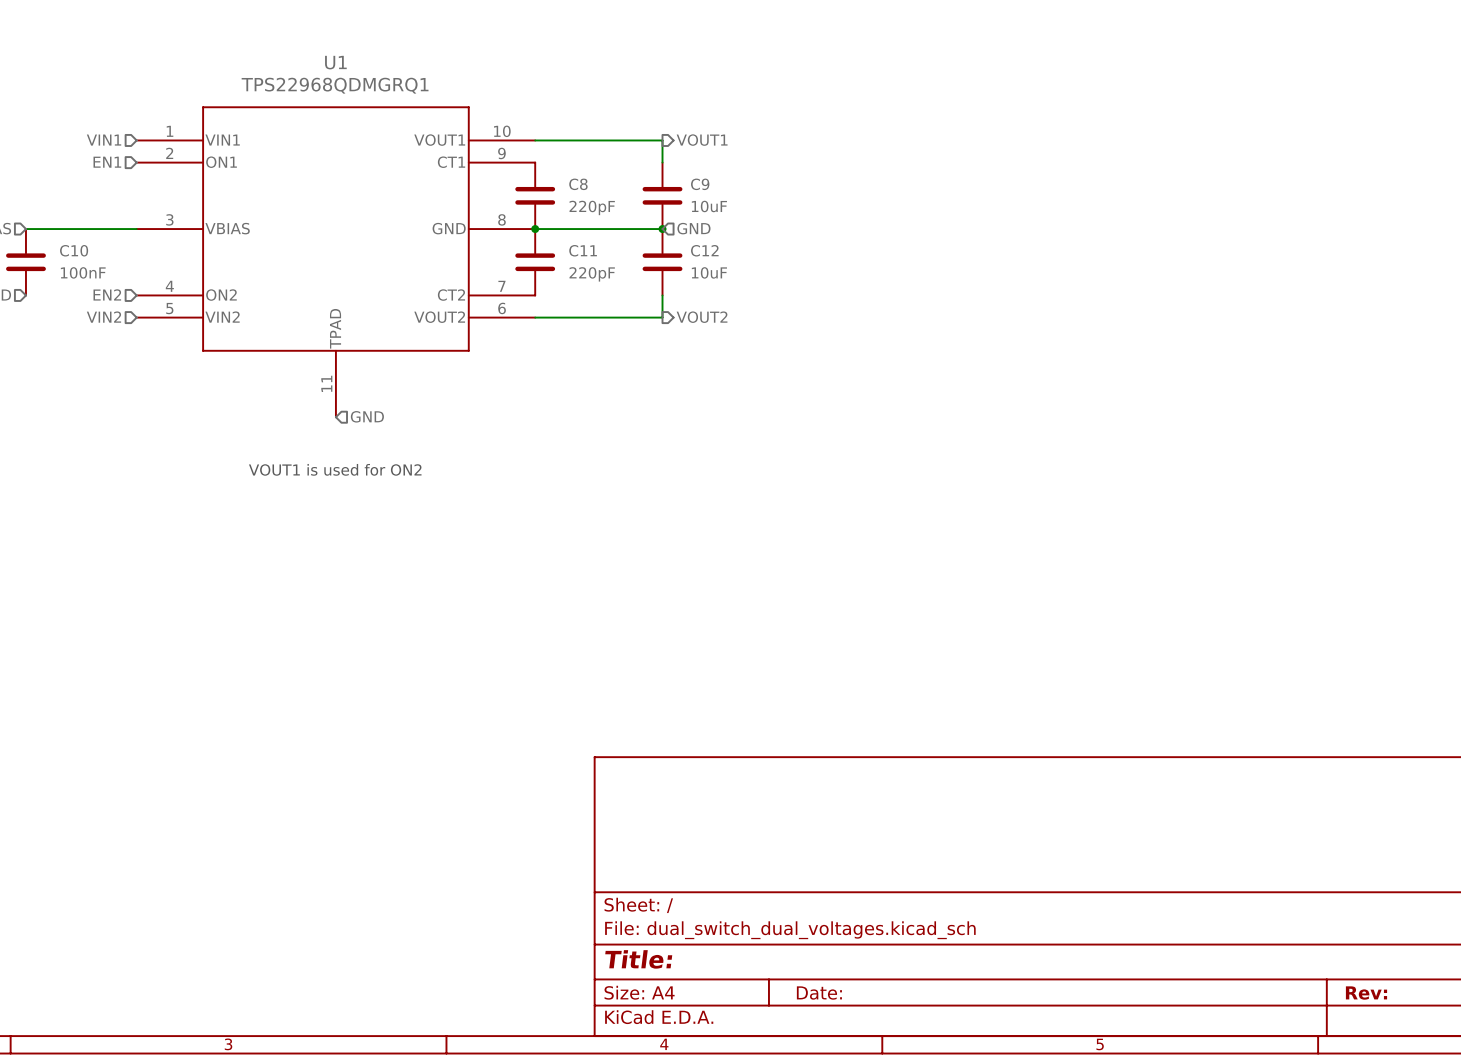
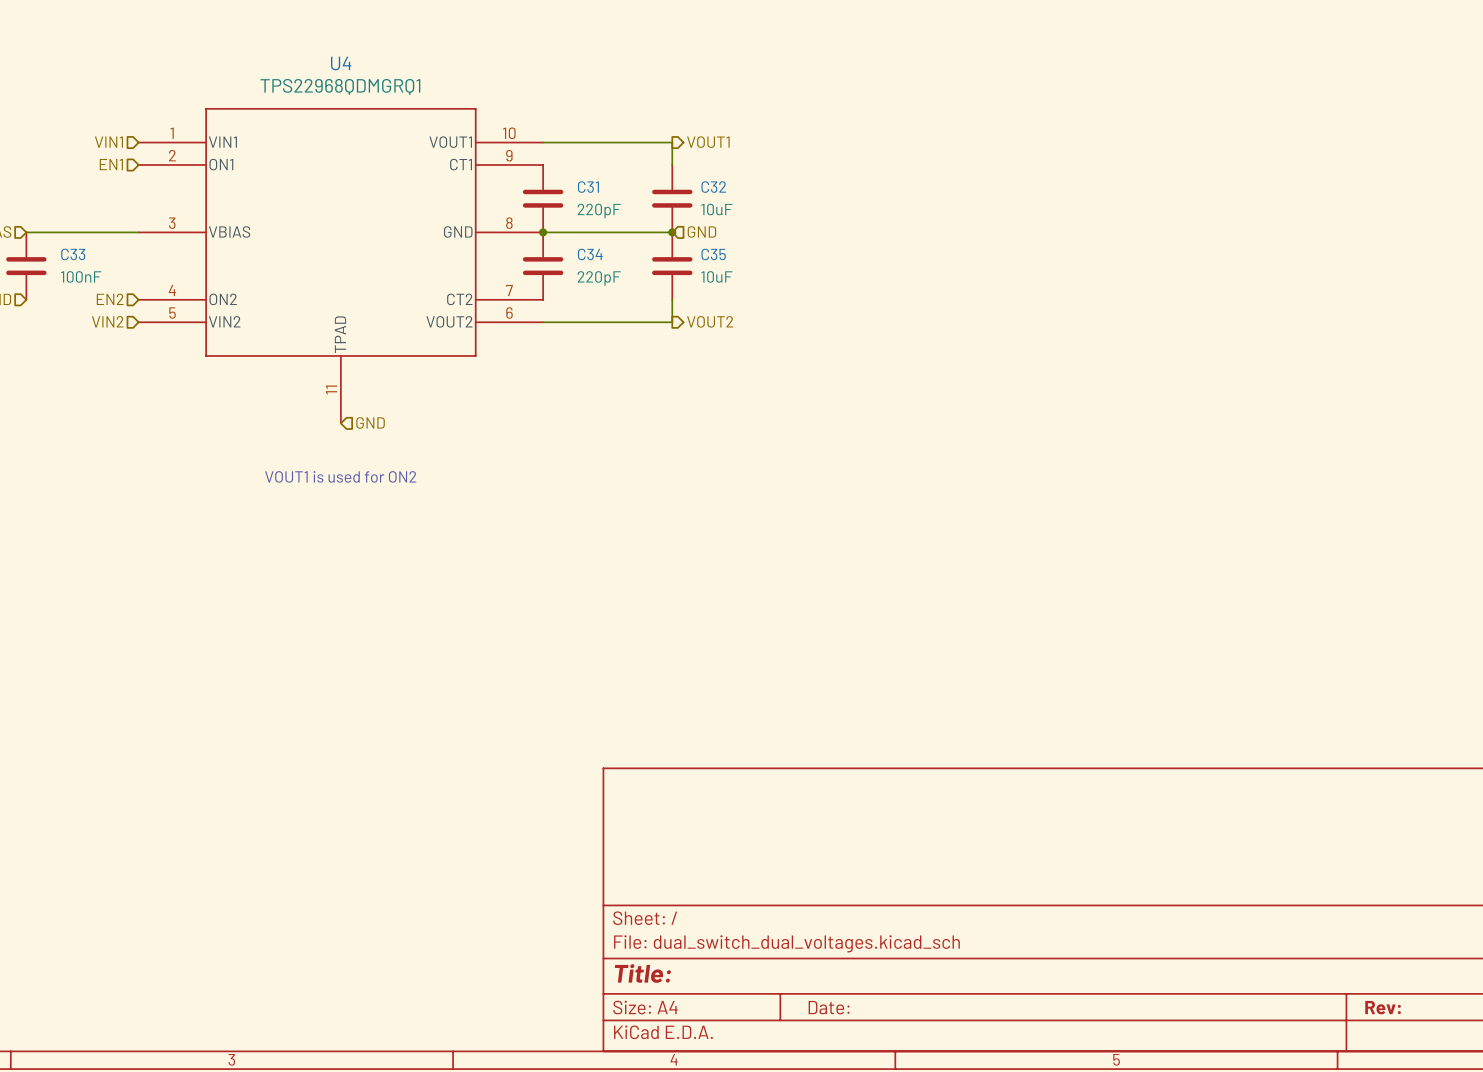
U1 name: U1 (335, 62) -> U4 (341, 63)
C8 name: C8 (578, 184) -> C31 (588, 187)
C9 name: C9 (700, 184) -> C32 (713, 187)
C10 name: C10 (74, 250) -> C33 (73, 254)
C11 name: C11 (583, 250) -> C34 (590, 254)
C12 name: C12 (704, 250) -> C35 (713, 254)

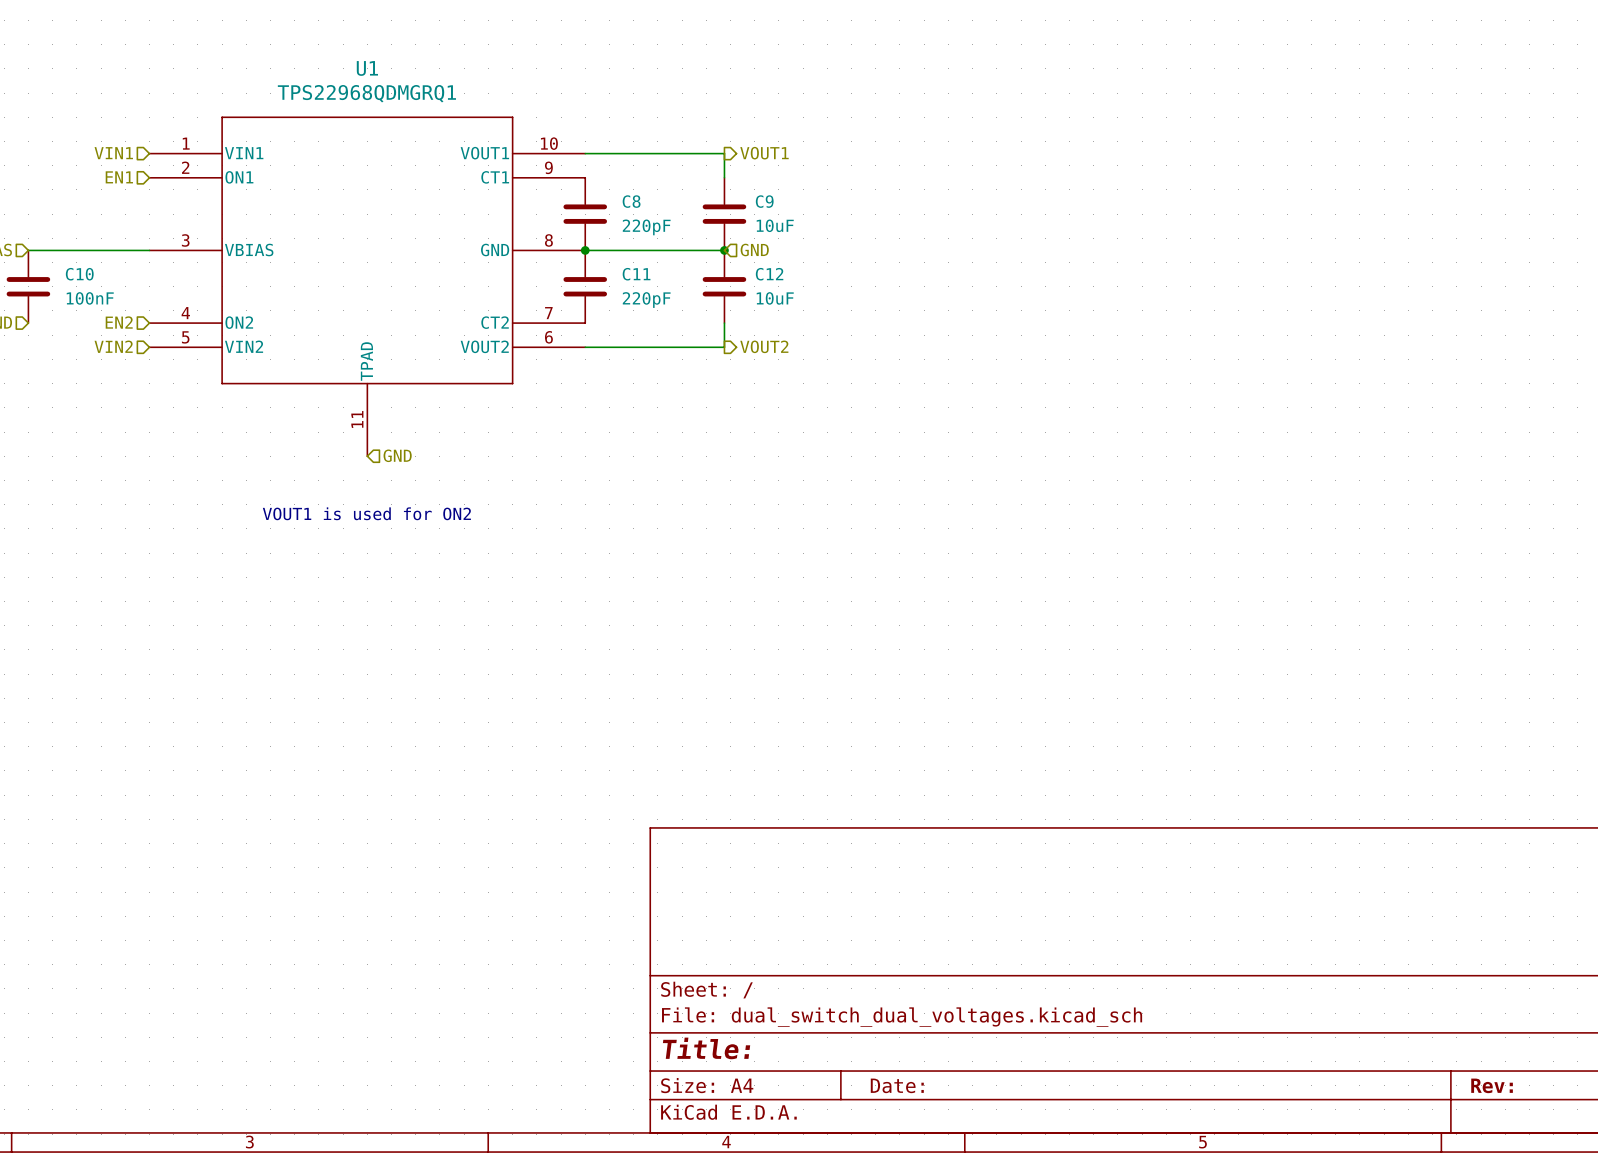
U4 name: U4 (341, 63) -> U1 (367, 68)
C31 name: C31 (588, 187) -> C8 (631, 201)
C32 name: C32 (713, 187) -> C9 (764, 201)
C33 name: C33 (73, 254) -> C10 (79, 274)
C34 name: C34 (590, 254) -> C11 (636, 274)
C35 name: C35 (713, 254) -> C12 (769, 274)

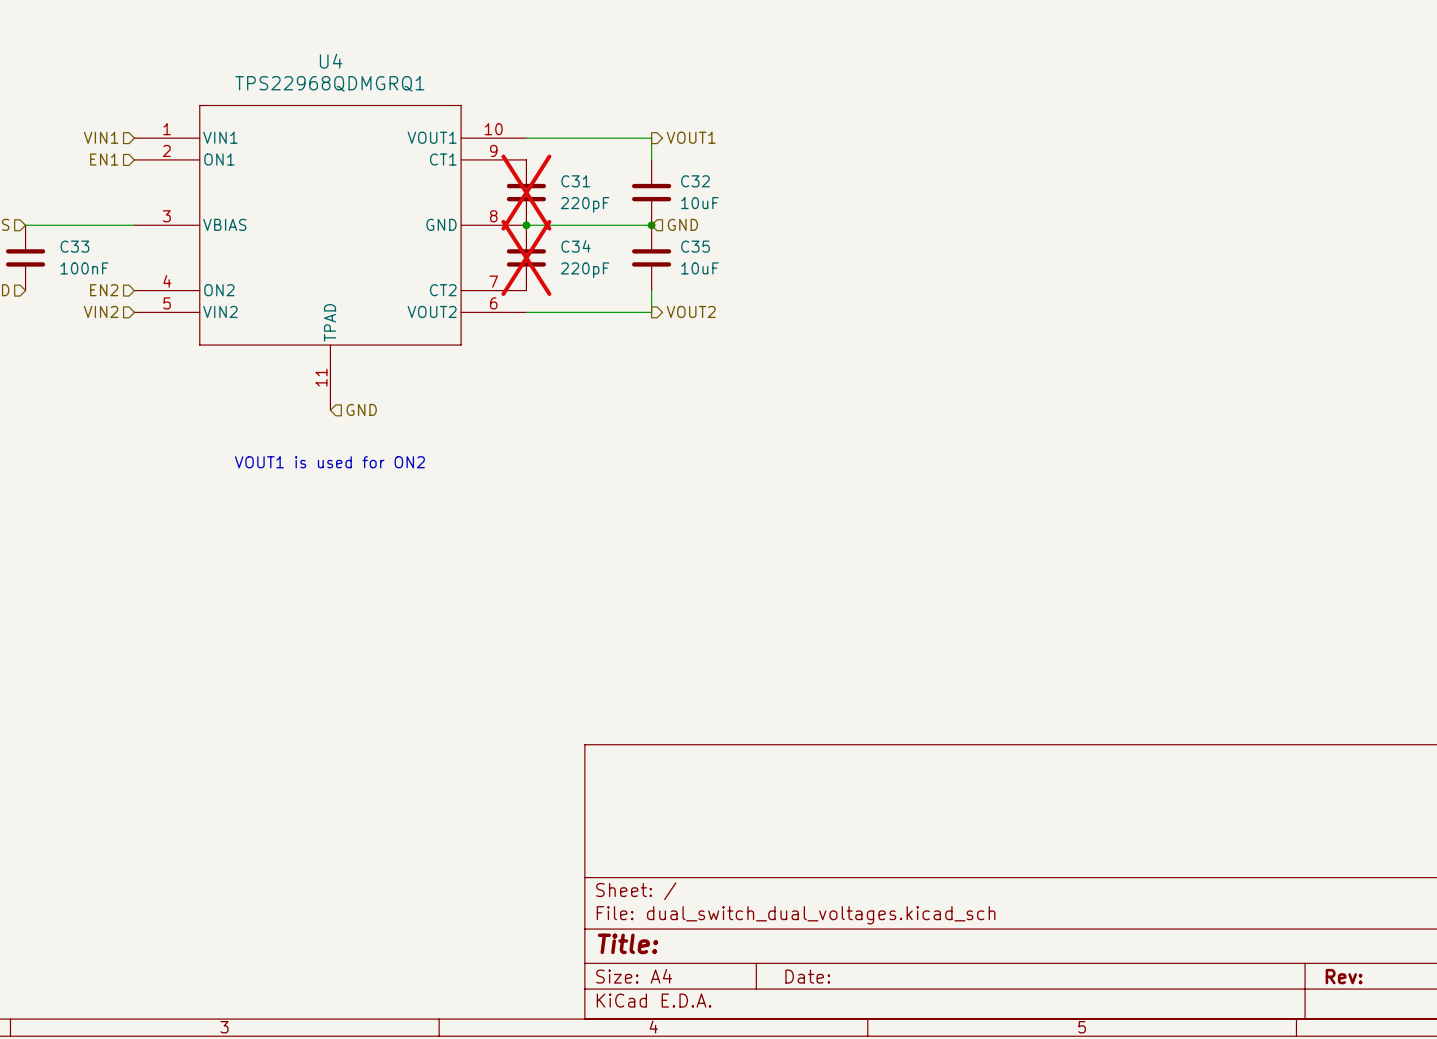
U1 name: U1 (367, 68) -> U4 (331, 61)
C8 name: C8 (631, 201) -> C31 (575, 181)
C9 name: C9 (764, 201) -> C32 (695, 181)
C8 do-not-place cross: none -> (526, 192)
C10 name: C10 (79, 274) -> C33 (74, 246)
C11 name: C11 (636, 274) -> C34 (576, 246)
C12 name: C12 (769, 274) -> C35 (695, 246)
C11 do-not-place cross: none -> (526, 257)

